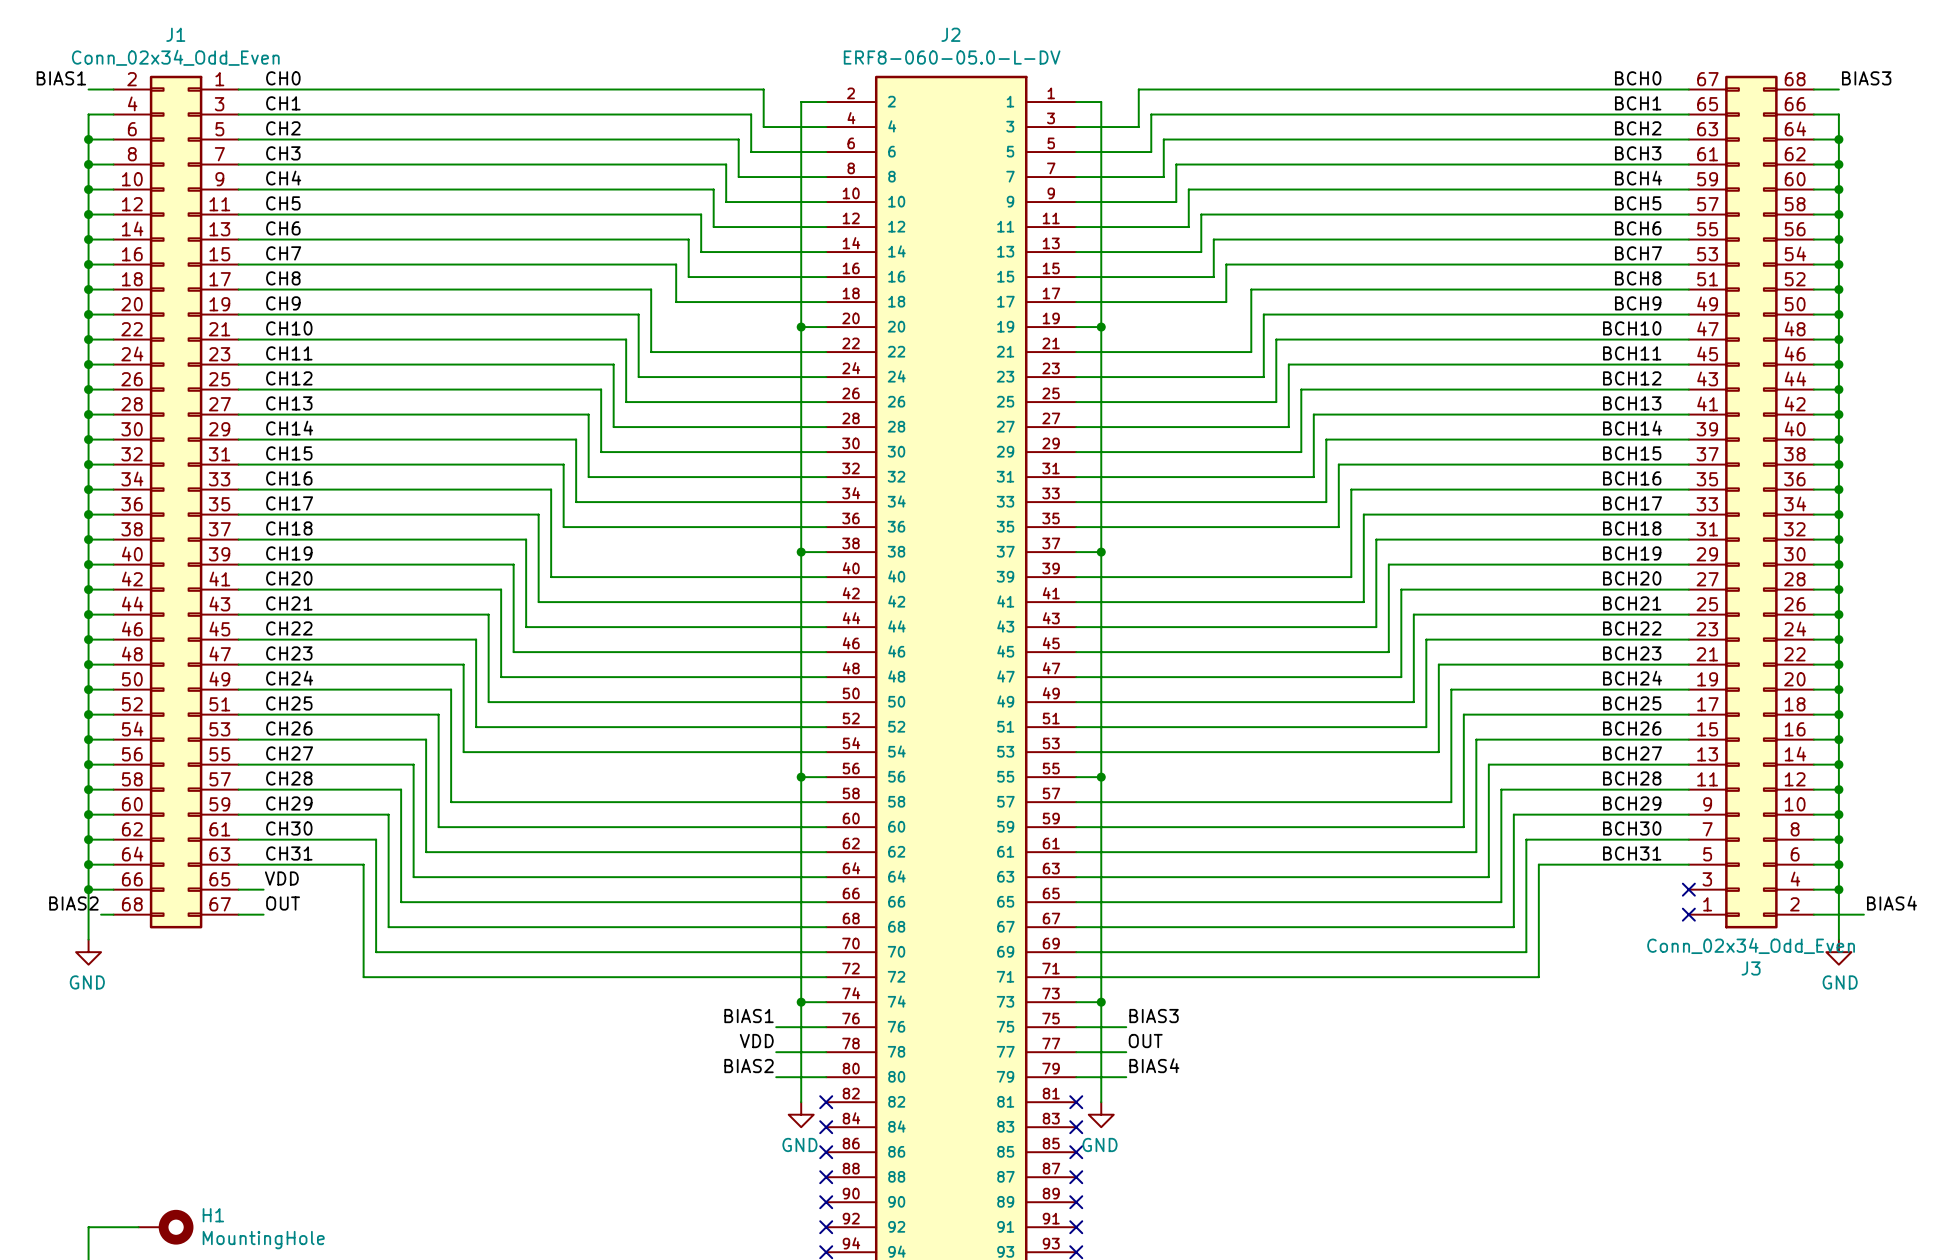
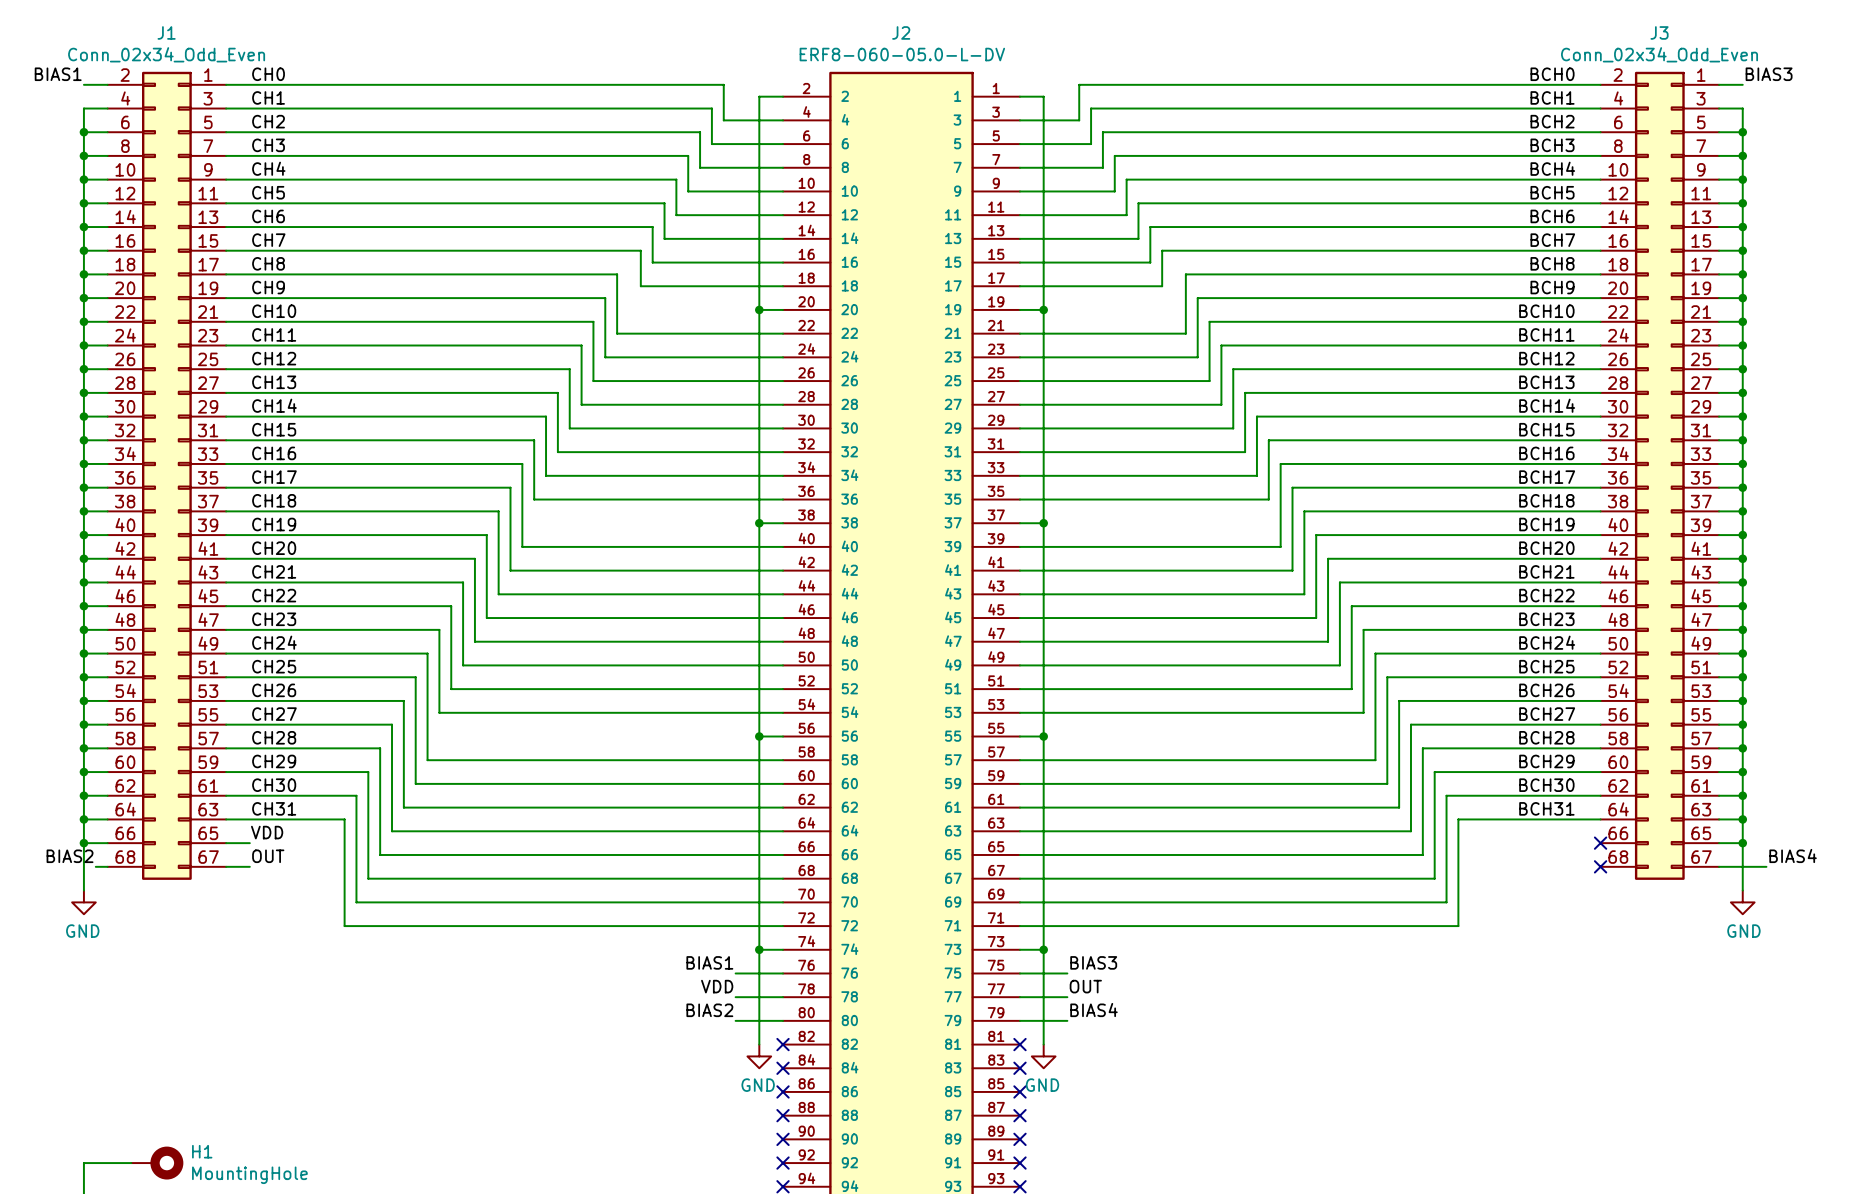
J3 rotation: 0° (1751, 502) -> 180° (1659, 475)

